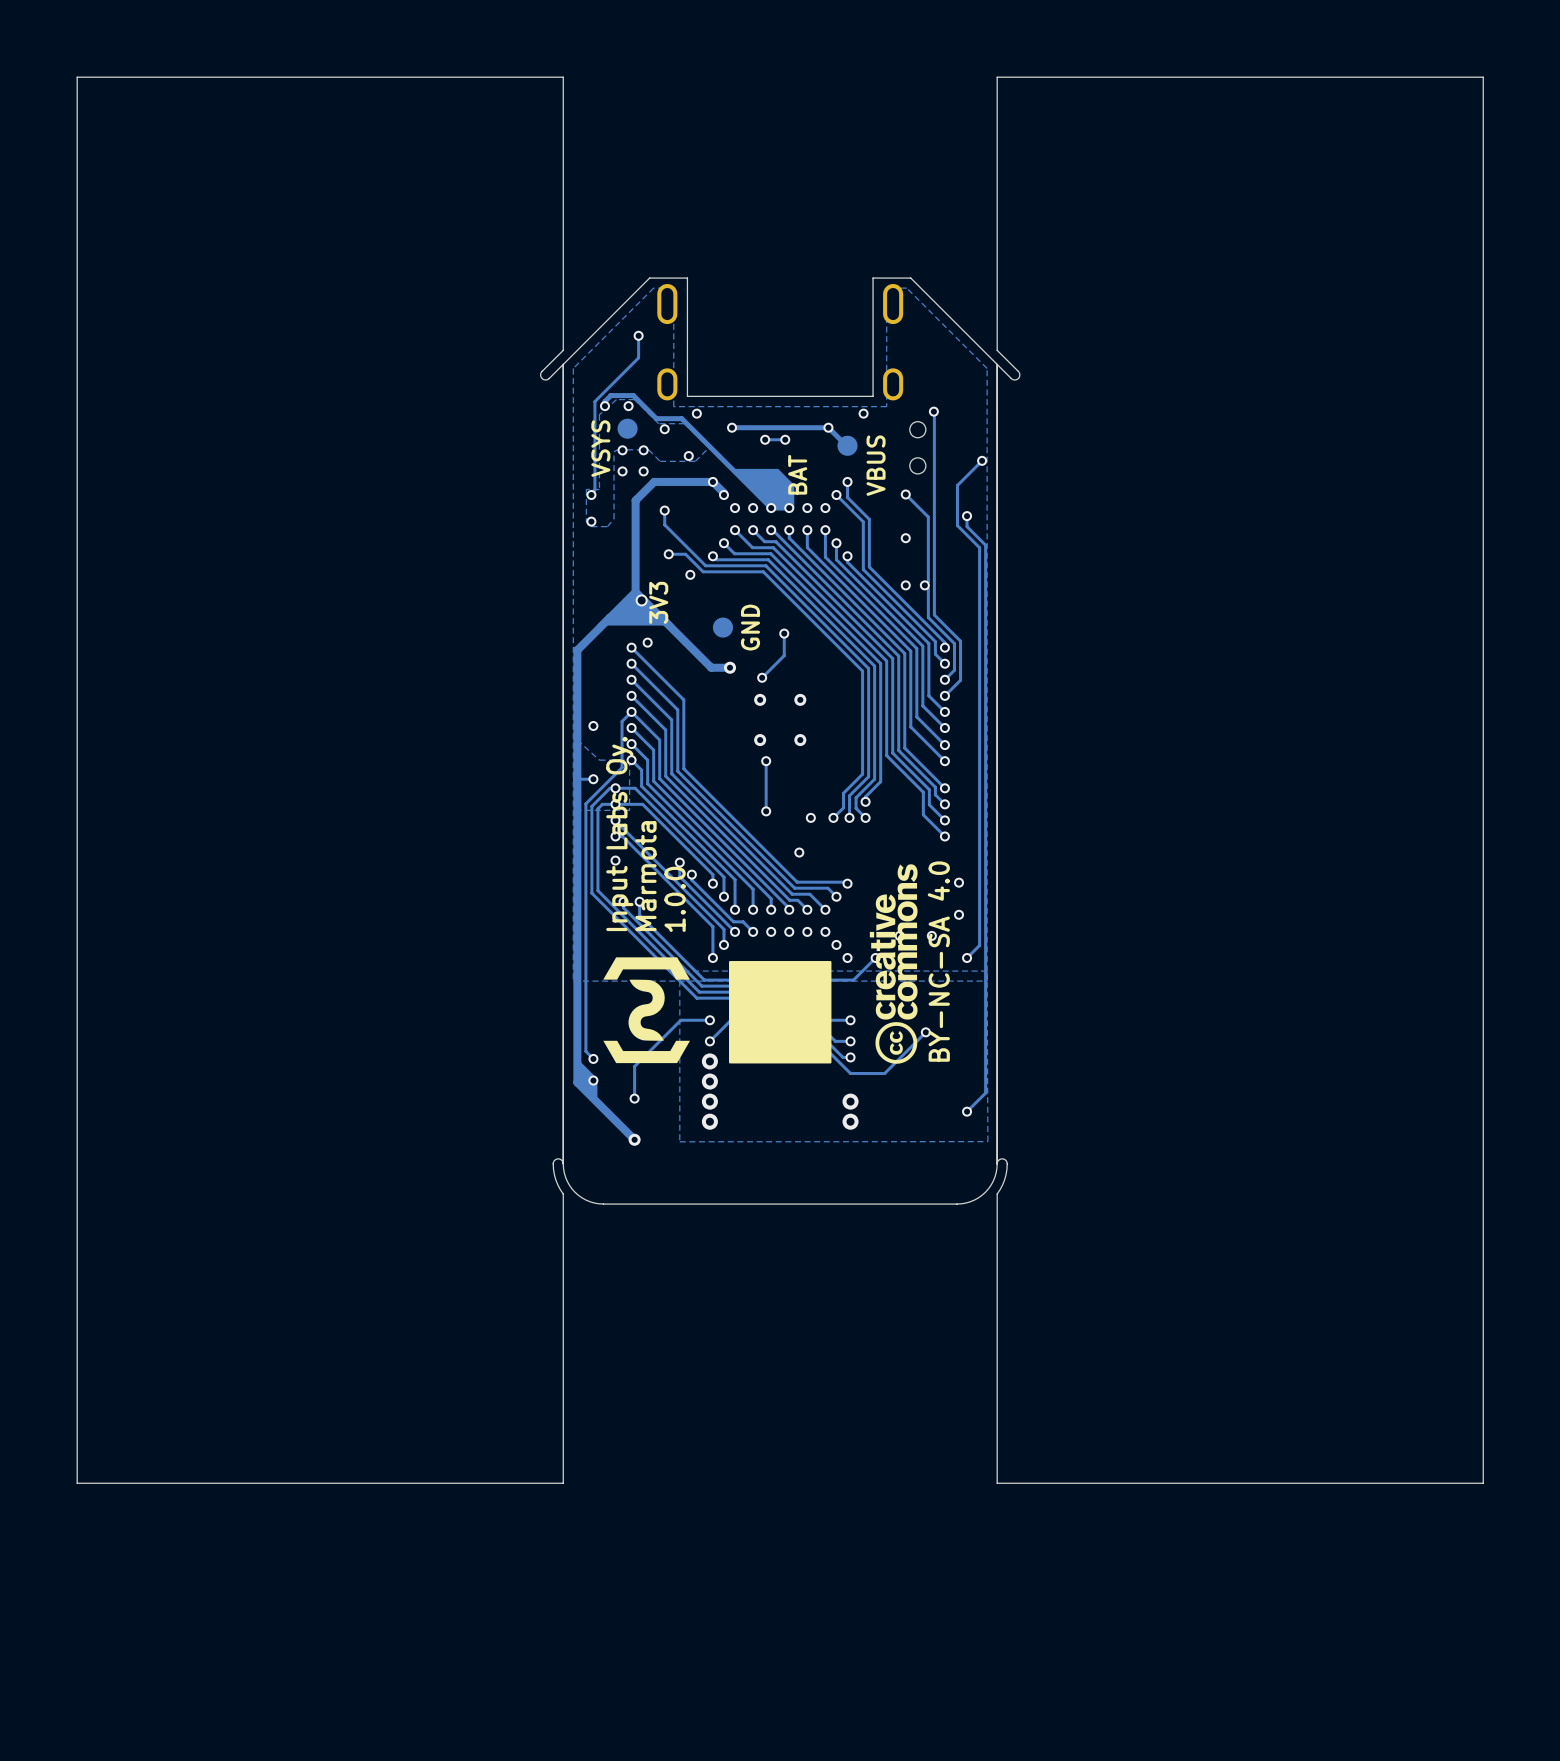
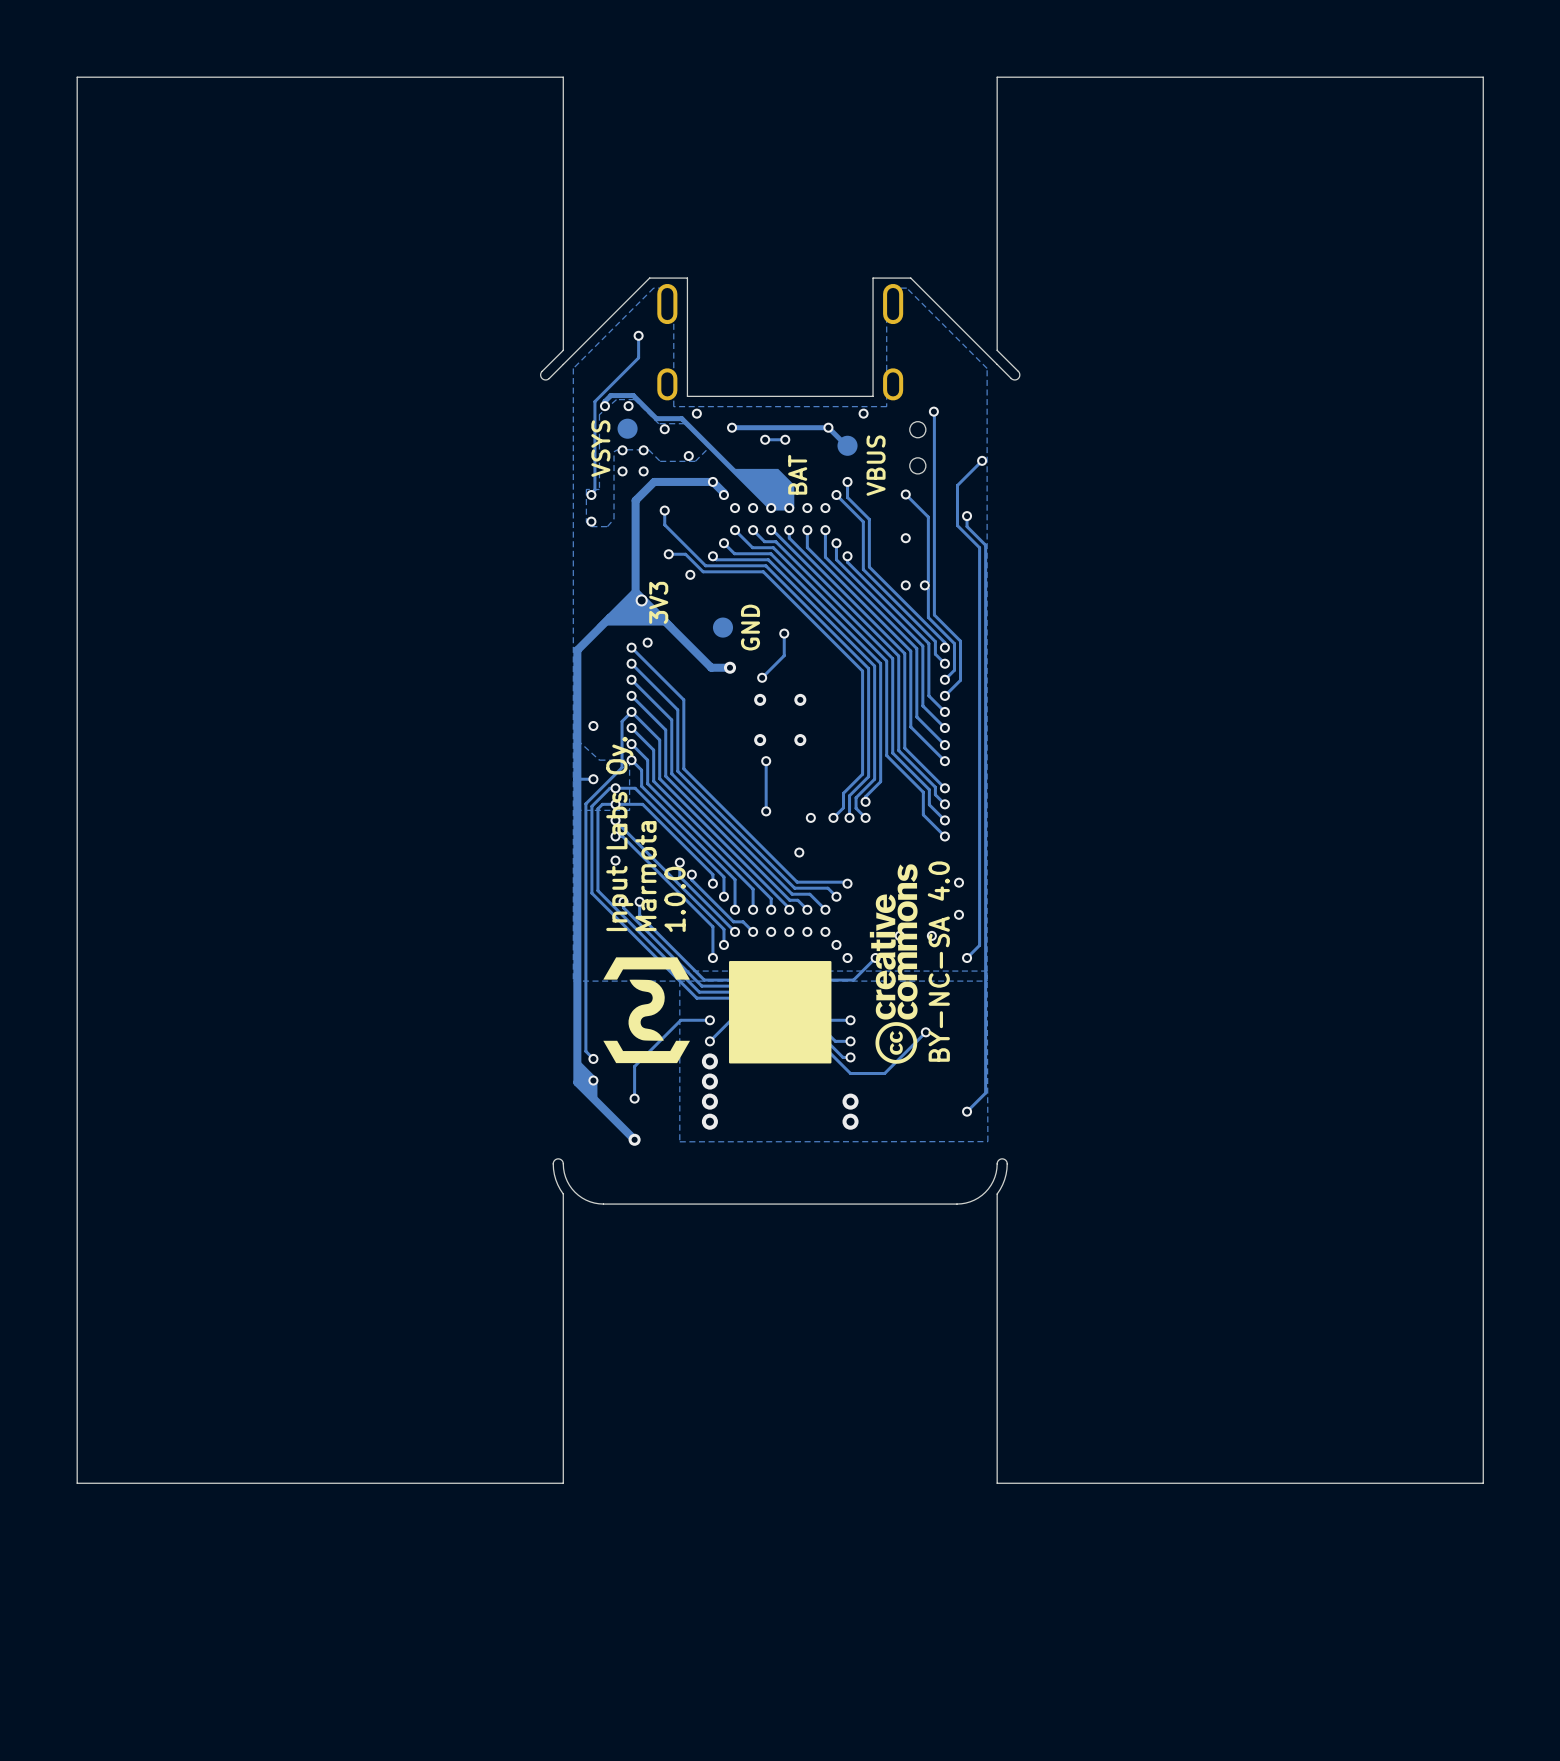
board edge: (563, 364) (563, 1163) (558, 1158) (553, 1163) -> (563, 1163) (558, 1158) (553, 1163)
board edge: (997, 364) (997, 1163) -> none

